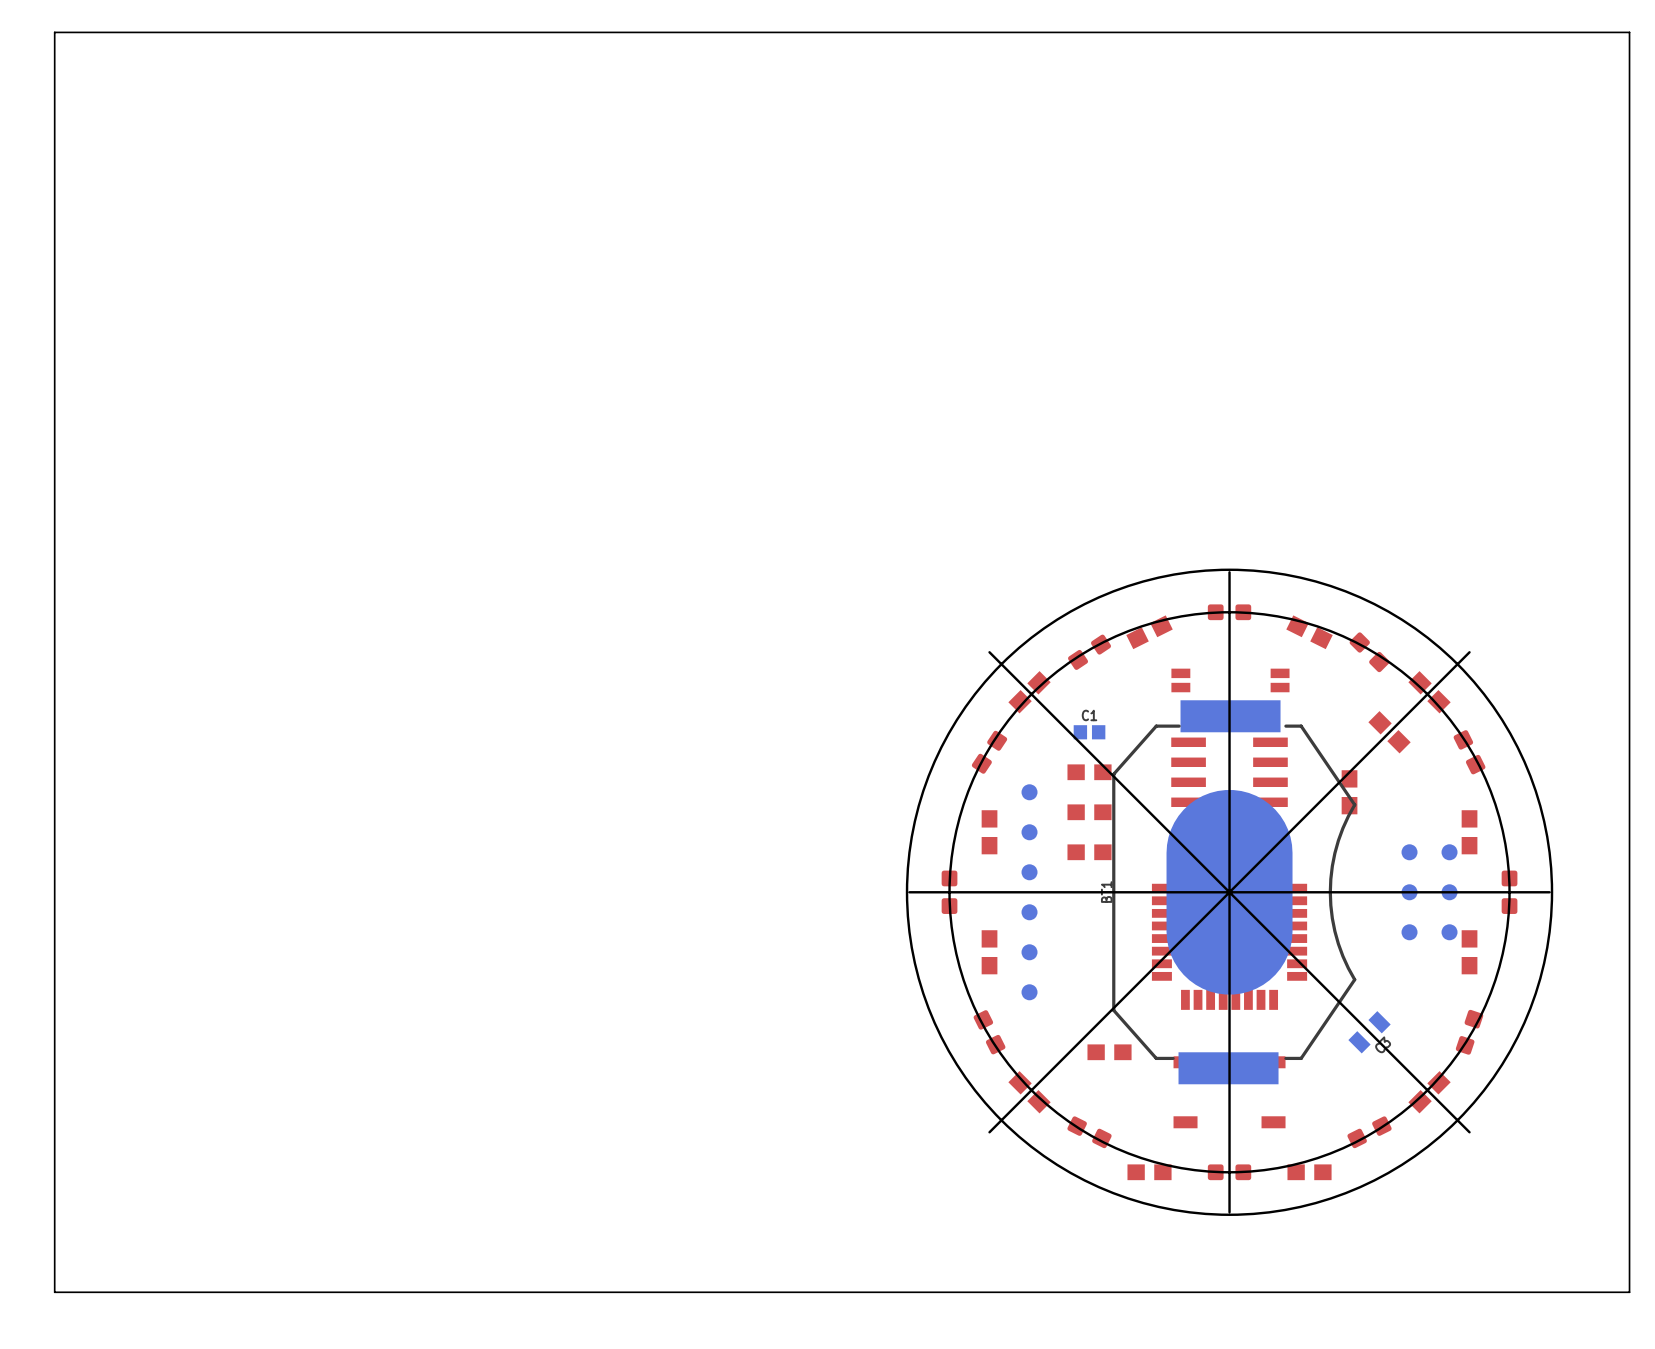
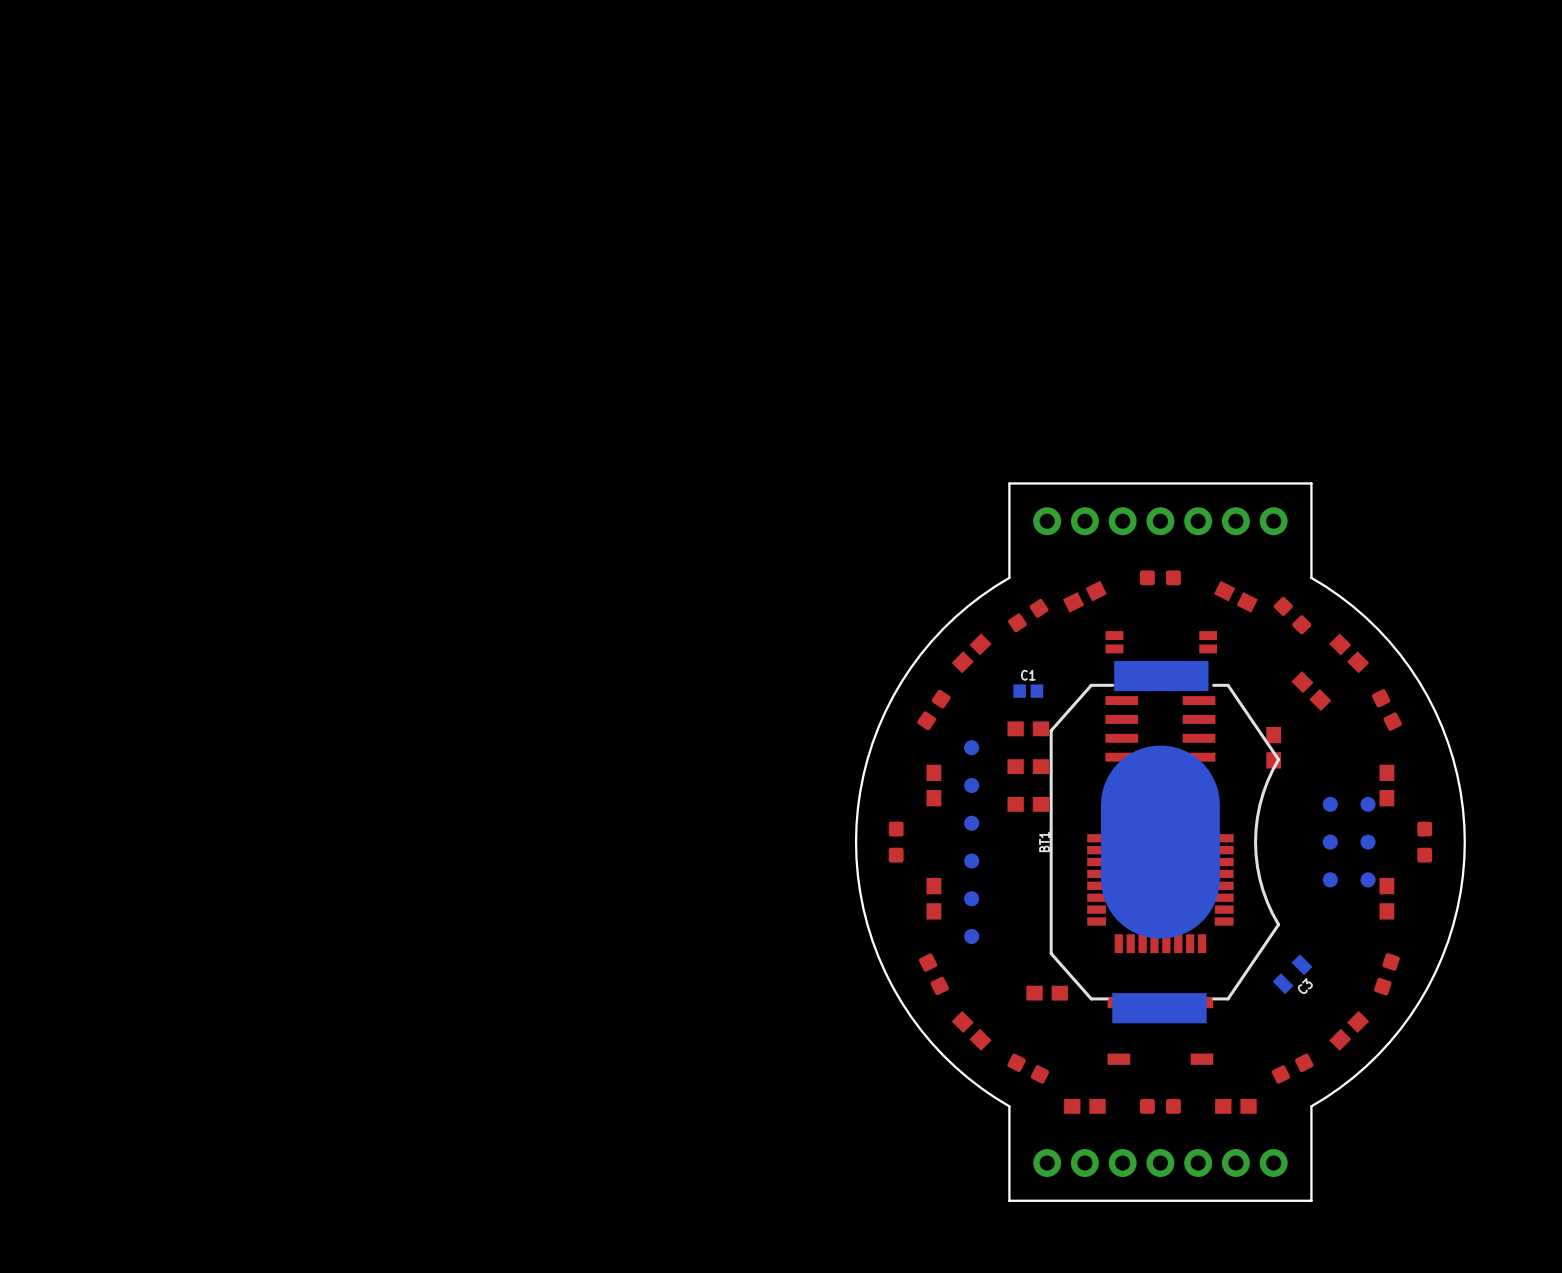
board edge: (1629, 32) (54, 32) (54, 1292) (1629, 1292) (1629, 32) -> none
board edge: none -> (1311, 483) (1311, 577) (1353, 606) (1377, 629) (1400, 654) (1427, 696) (1442, 727) (1453, 758) (1462, 808) (1464, 858) (1457, 908) (1442, 957) (1419, 1002) (1389, 1042) (1353, 1077) (1311, 1106) (1311, 1200) (1009, 1200) (1009, 1106) (967, 1077) (942, 1055) (920, 1029) (893, 987) (878, 957) (867, 925) (857, 875) (856, 825) (863, 775) (878, 727) (901, 682) (931, 641) (967, 606) (1009, 577) (1009, 483) (1311, 483)
part: none -> (1084, 521)
part: none -> (1217, 521)
round board edge: [905, 568, 1554, 1216] -> none
board edge: (1229, 572) (1229, 1212) -> none
round board edge: [948, 611, 1511, 1174] -> none
board edge: (989, 652) (1469, 1132) -> none
board edge: (1469, 652) (989, 1132) -> none
board edge: (1549, 892) (909, 892) -> none
part: none -> (1084, 1163)
part: none -> (1217, 1163)

